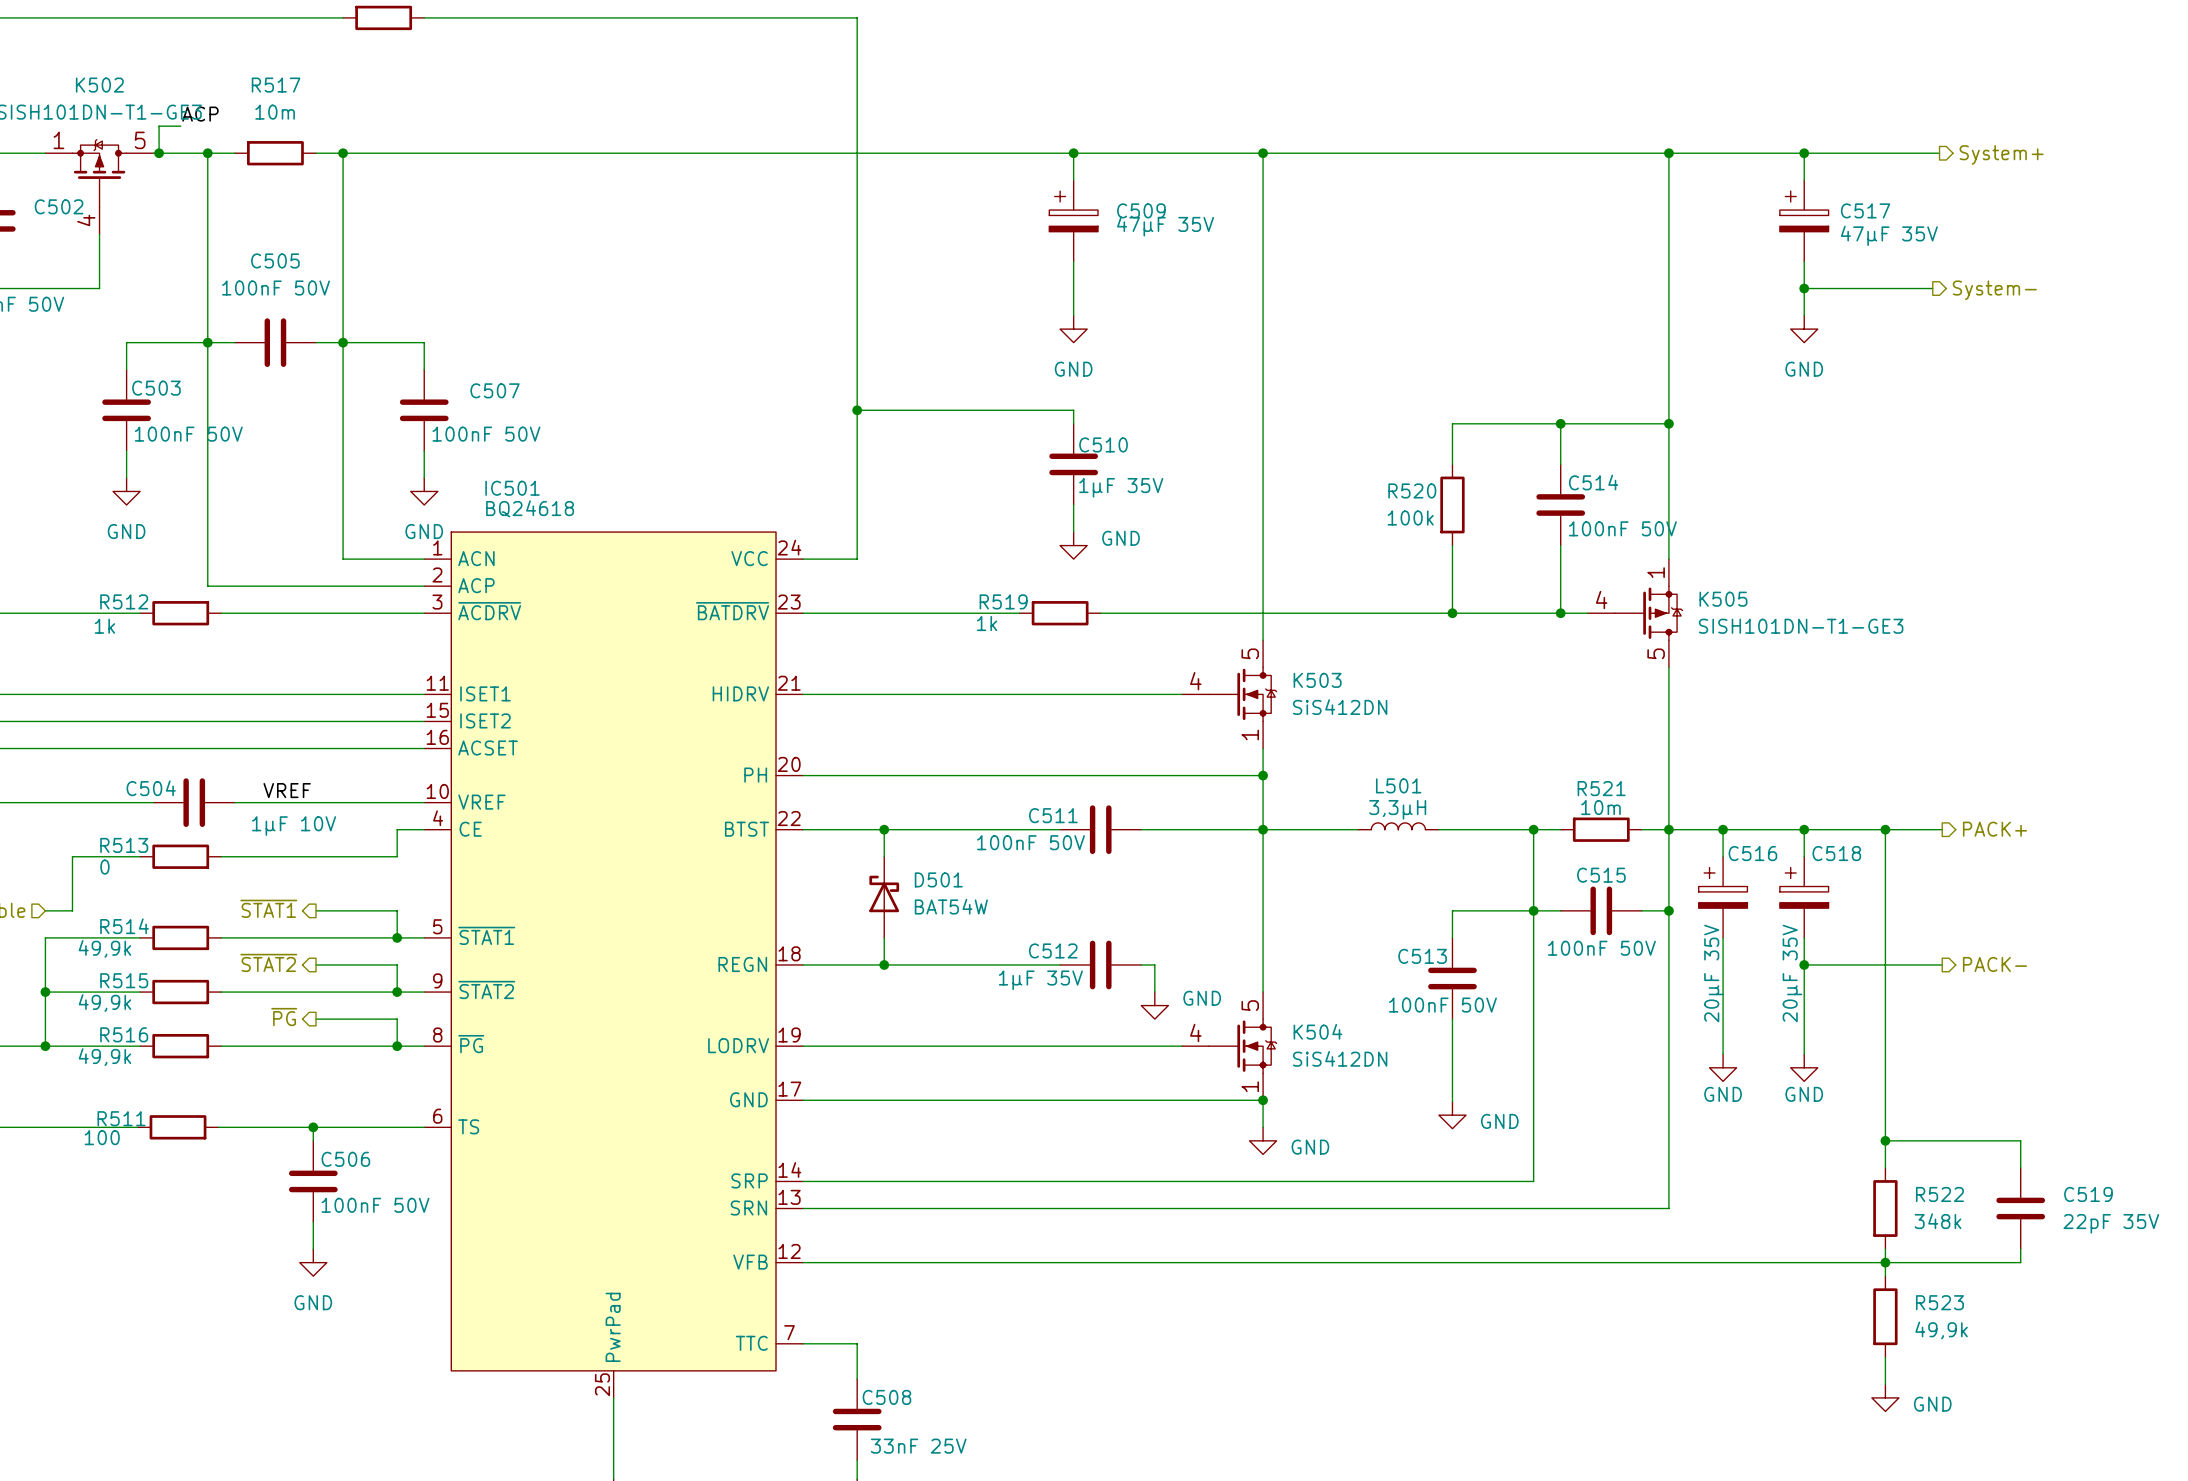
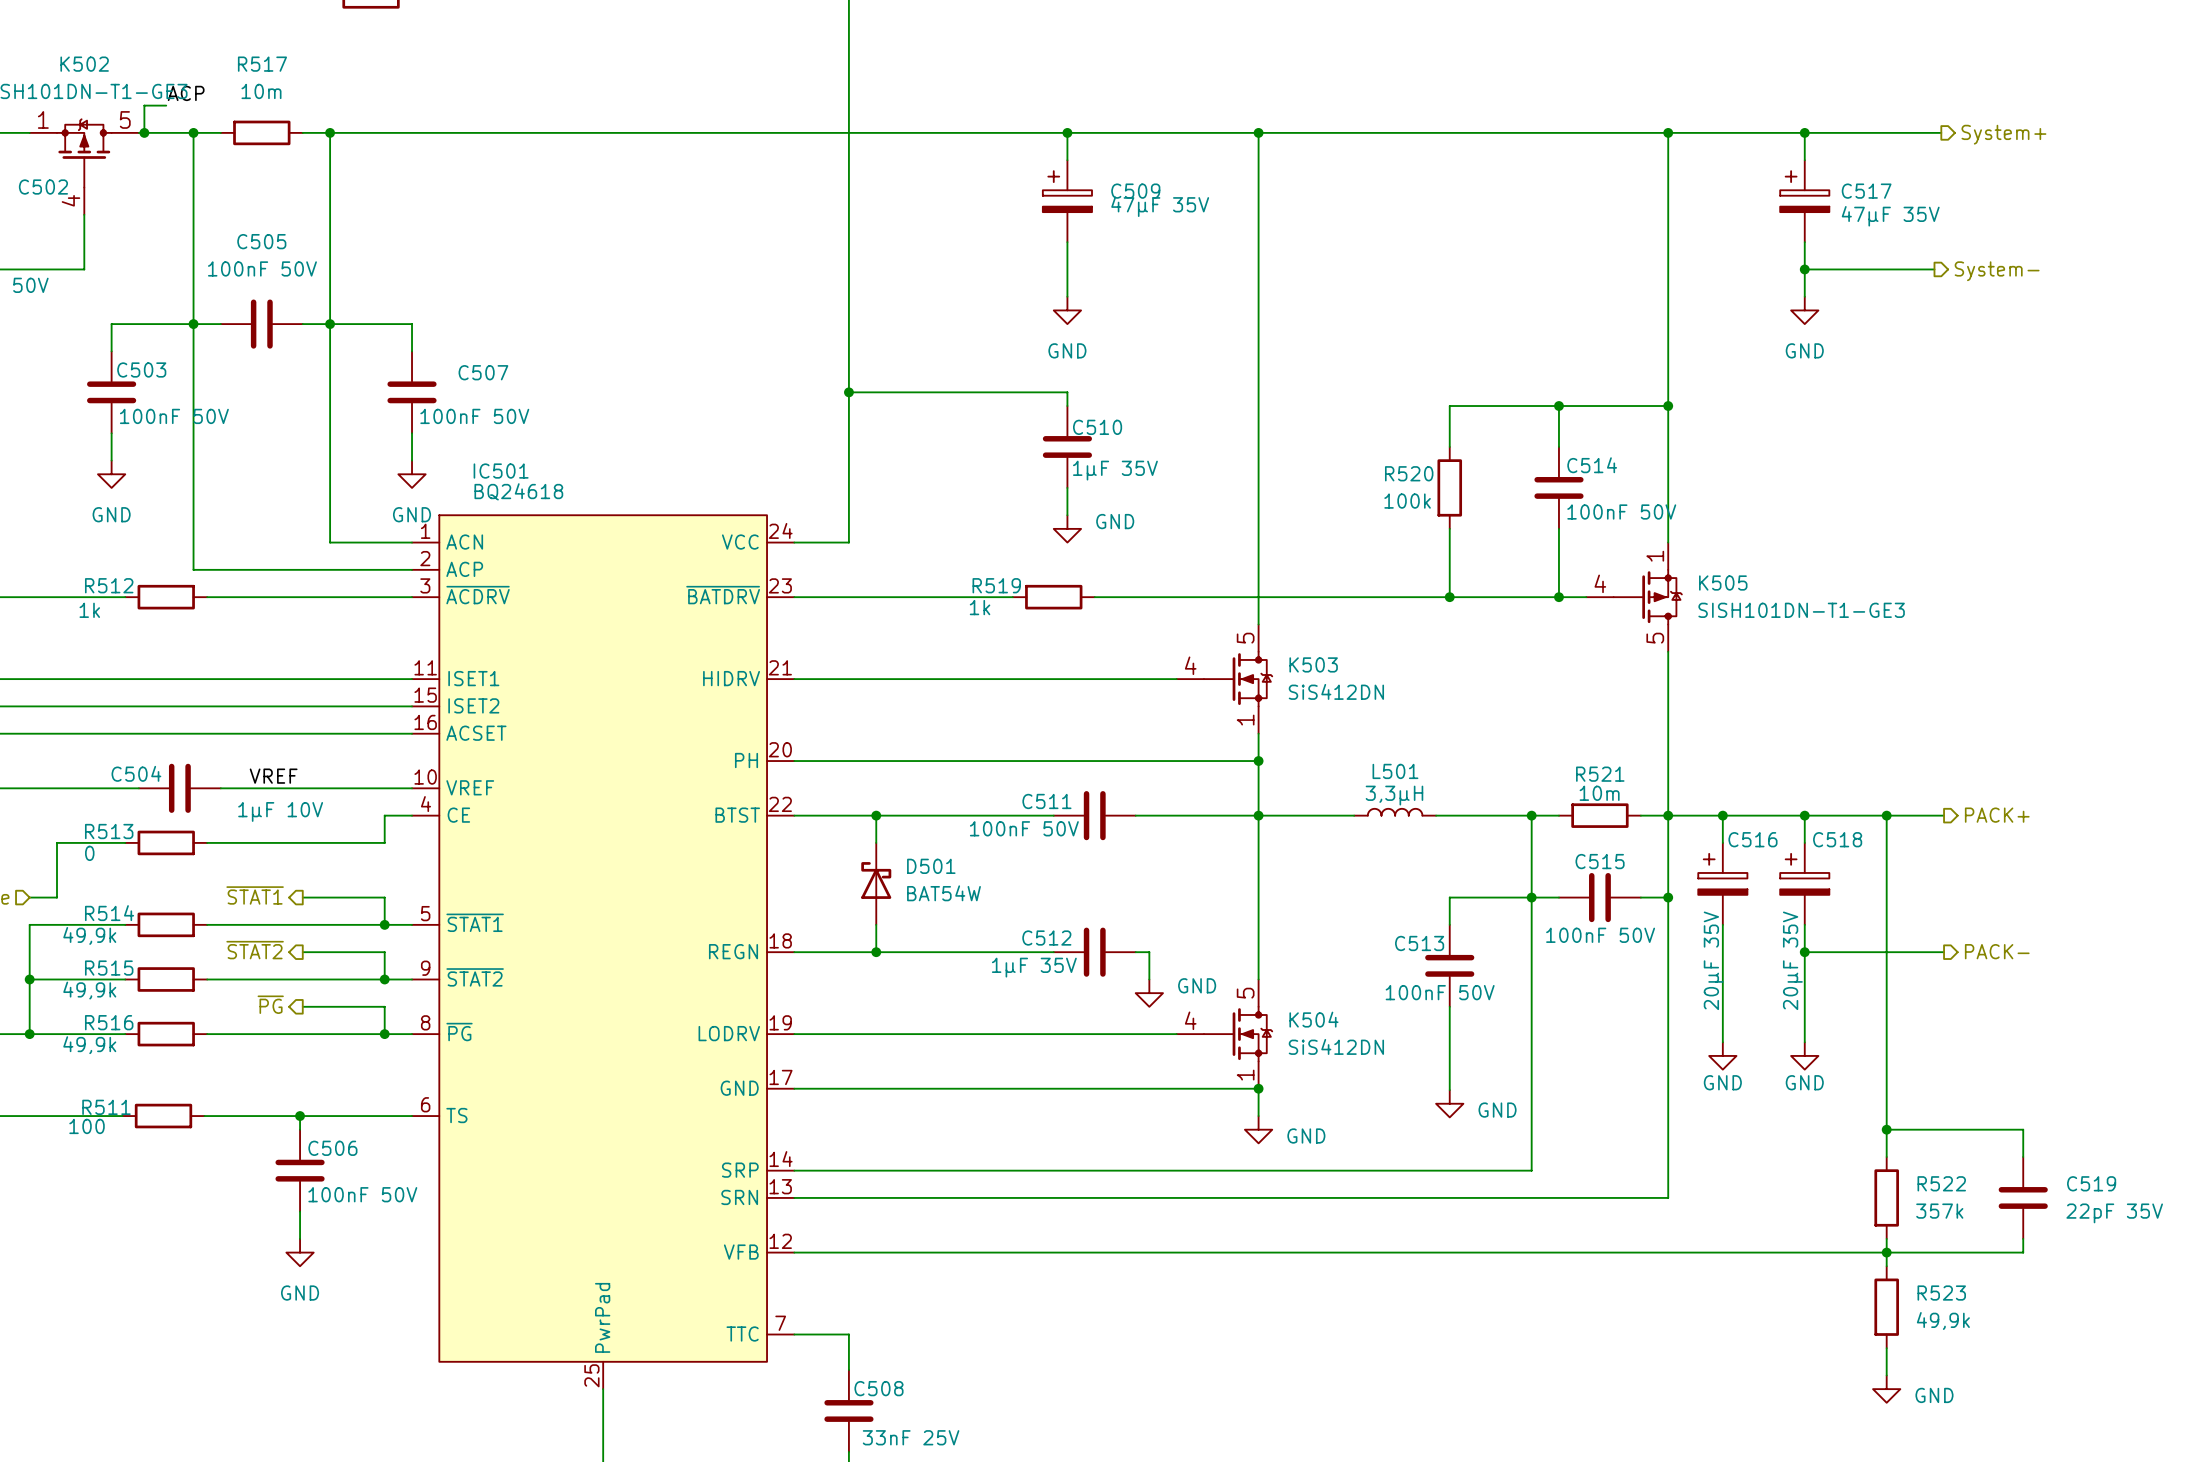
R522 value: 348k (1938, 1221) -> 357k (1939, 1211)

